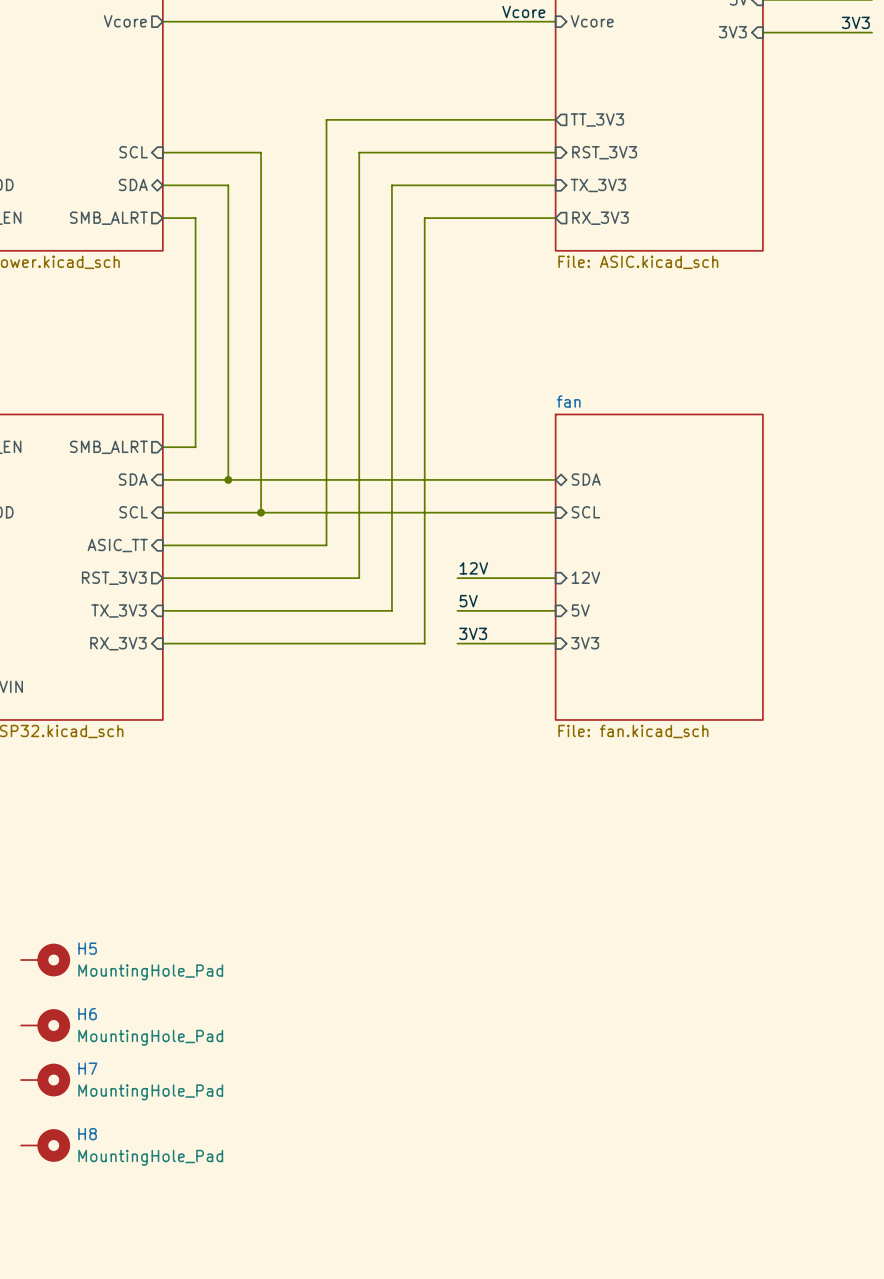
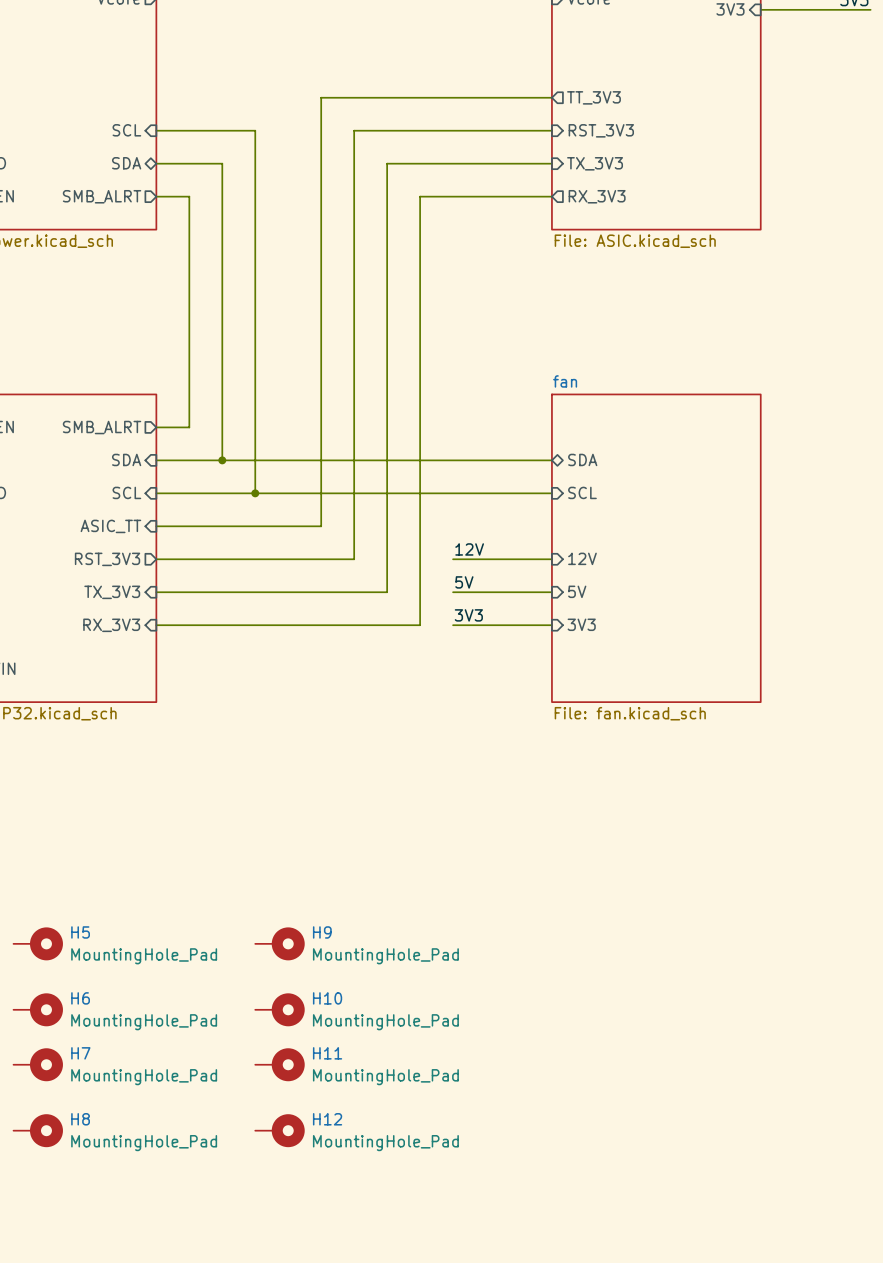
H9: none -> MountingHole_Pad (279, 943)
H10: none -> MountingHole_Pad (279, 1009)
H11: none -> MountingHole_Pad (279, 1064)
H12: none -> MountingHole_Pad (279, 1130)

